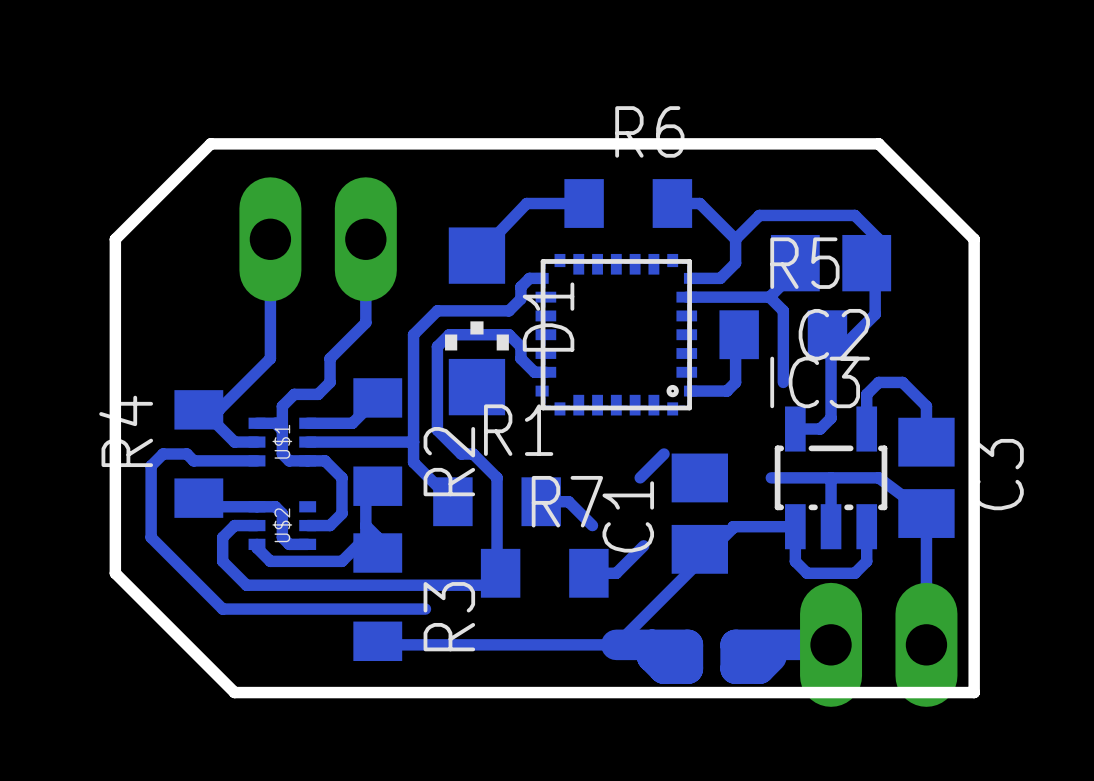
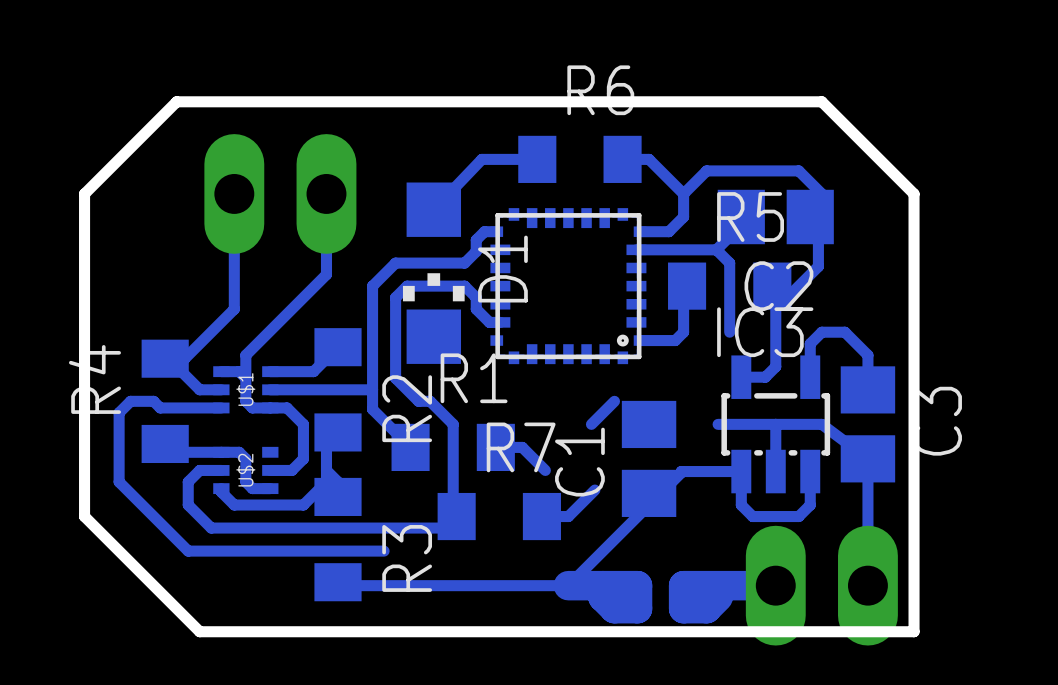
bottom track: (330, 358) (330, 382) (318, 394) (294, 394) -> (291, 309) (257, 343)

